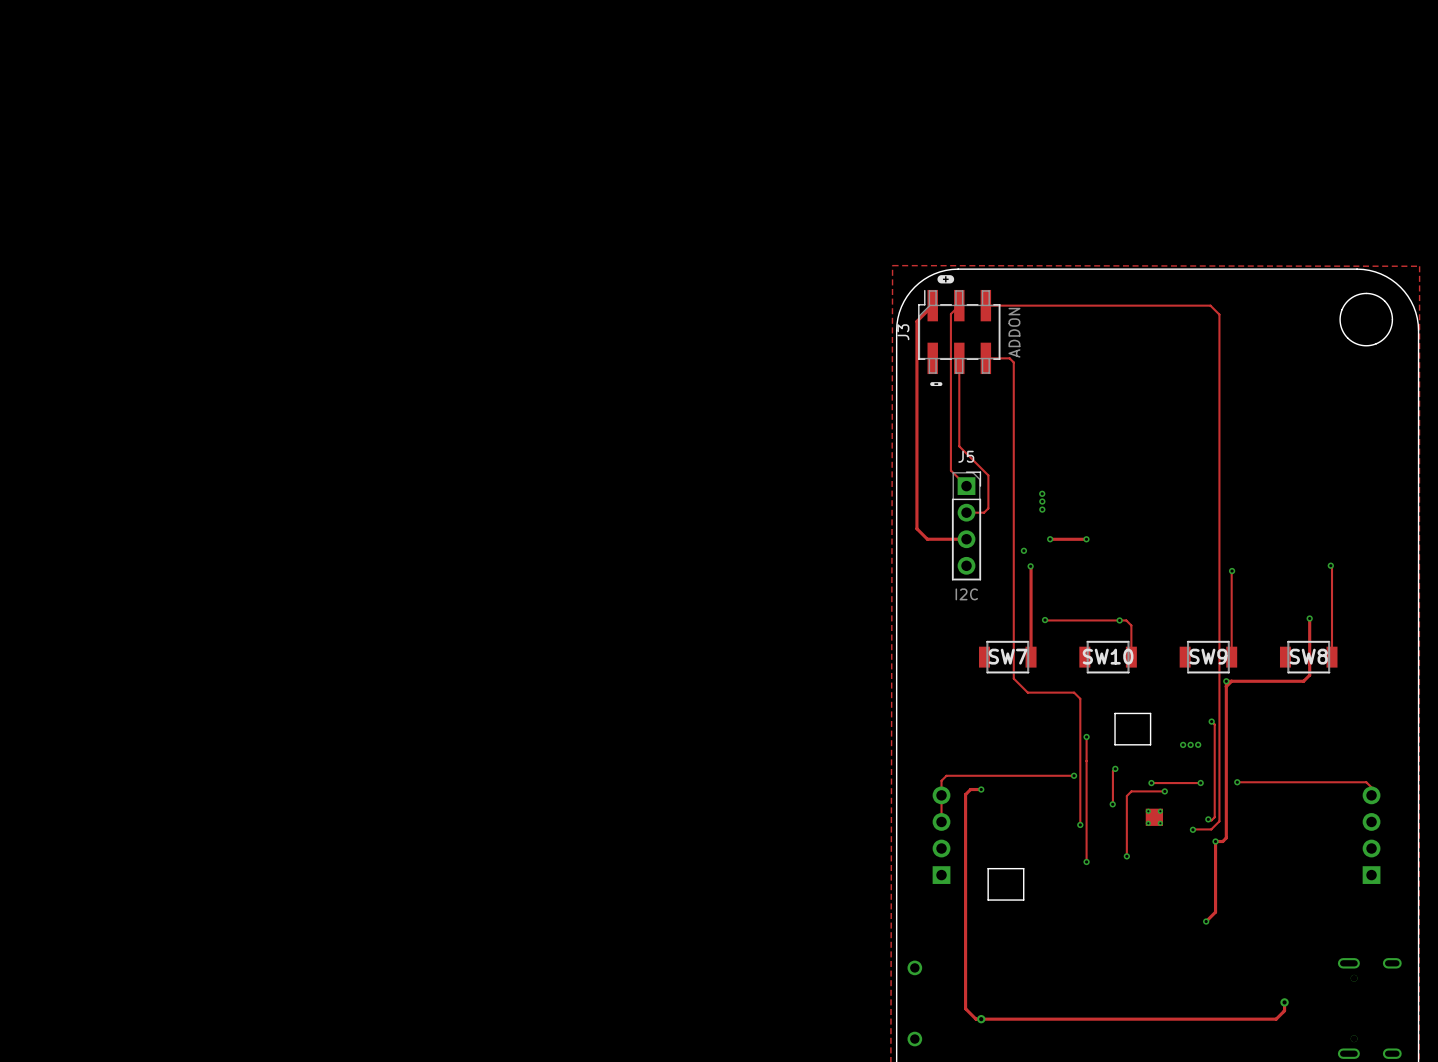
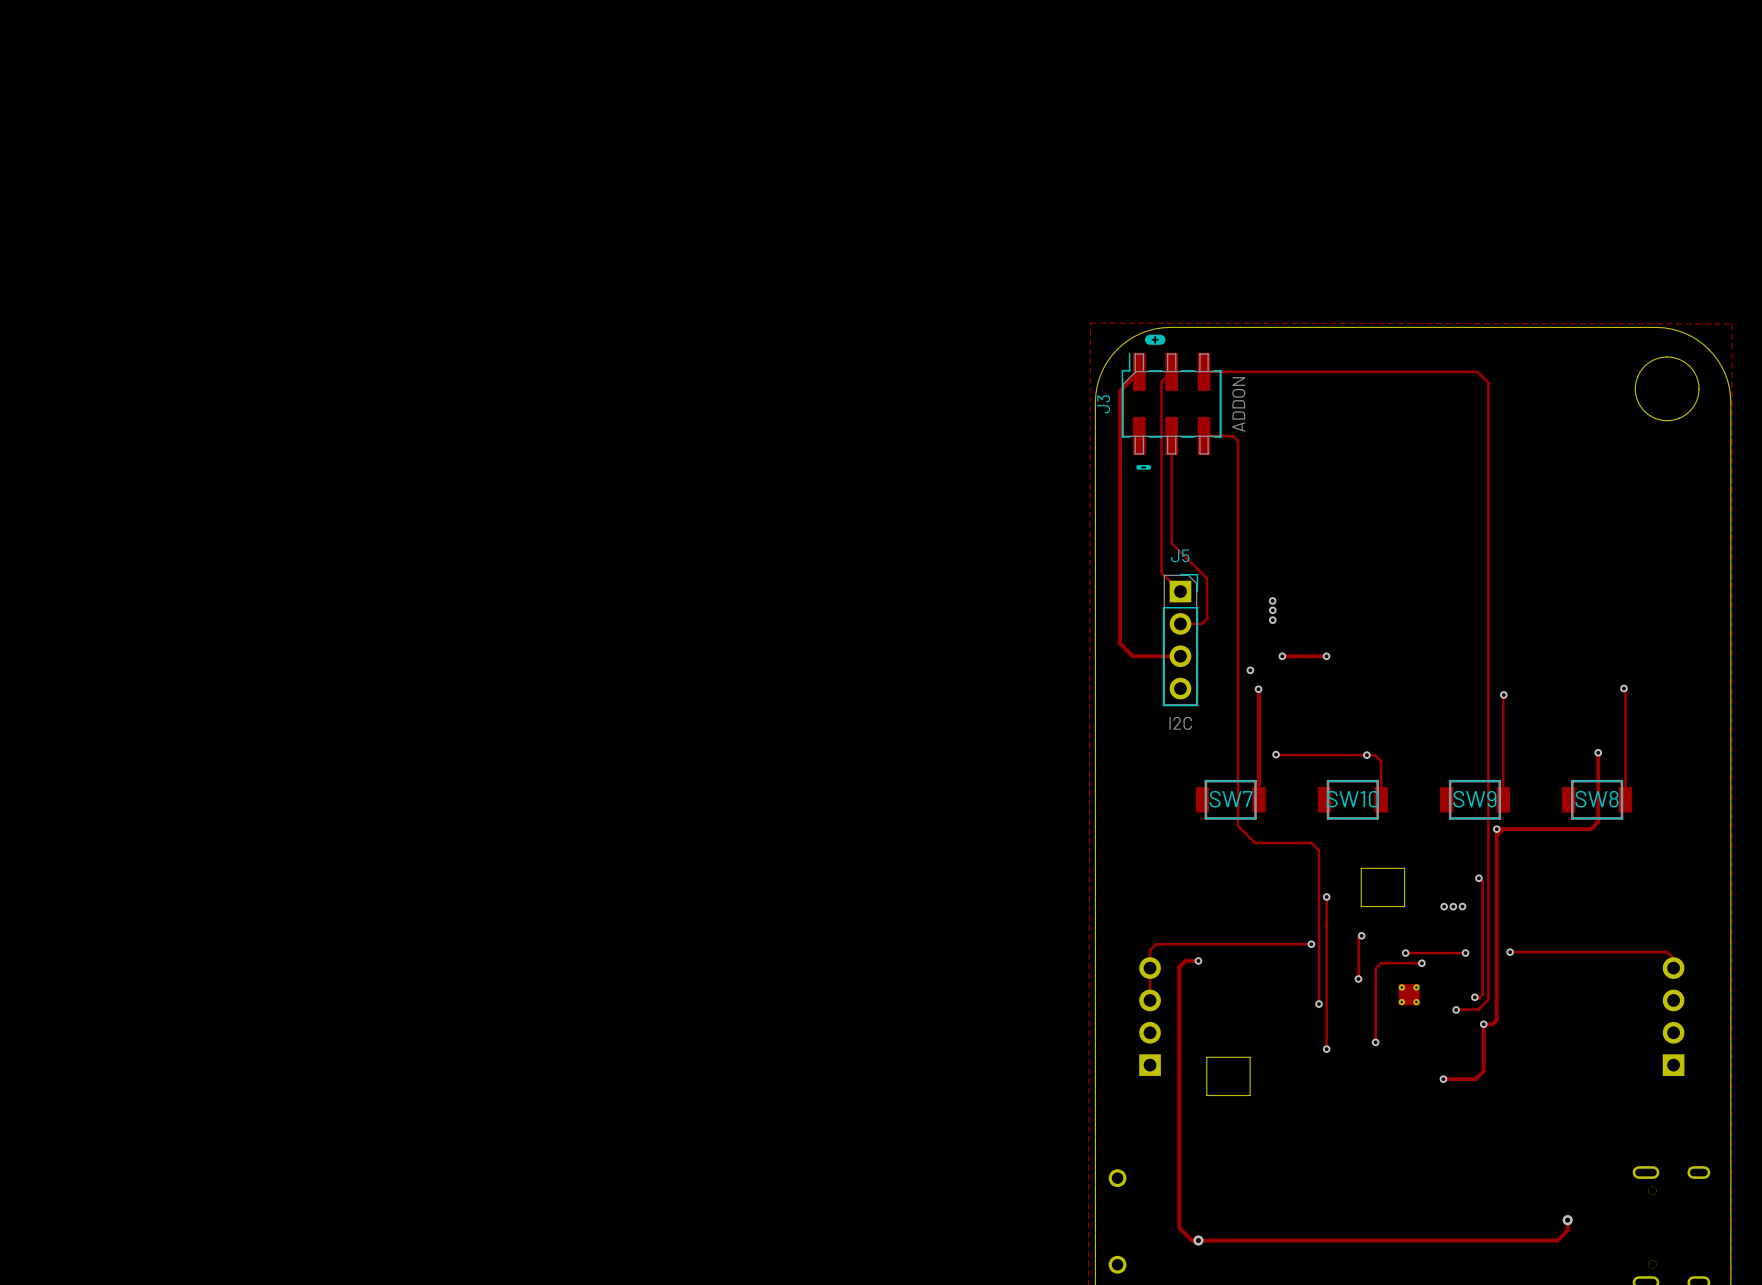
track: (1215, 880) (1215, 912) (1206, 921) -> (1483, 1071) (1475, 1079) (1443, 1079)
via position: (1206, 921) -> (1443, 1079)

